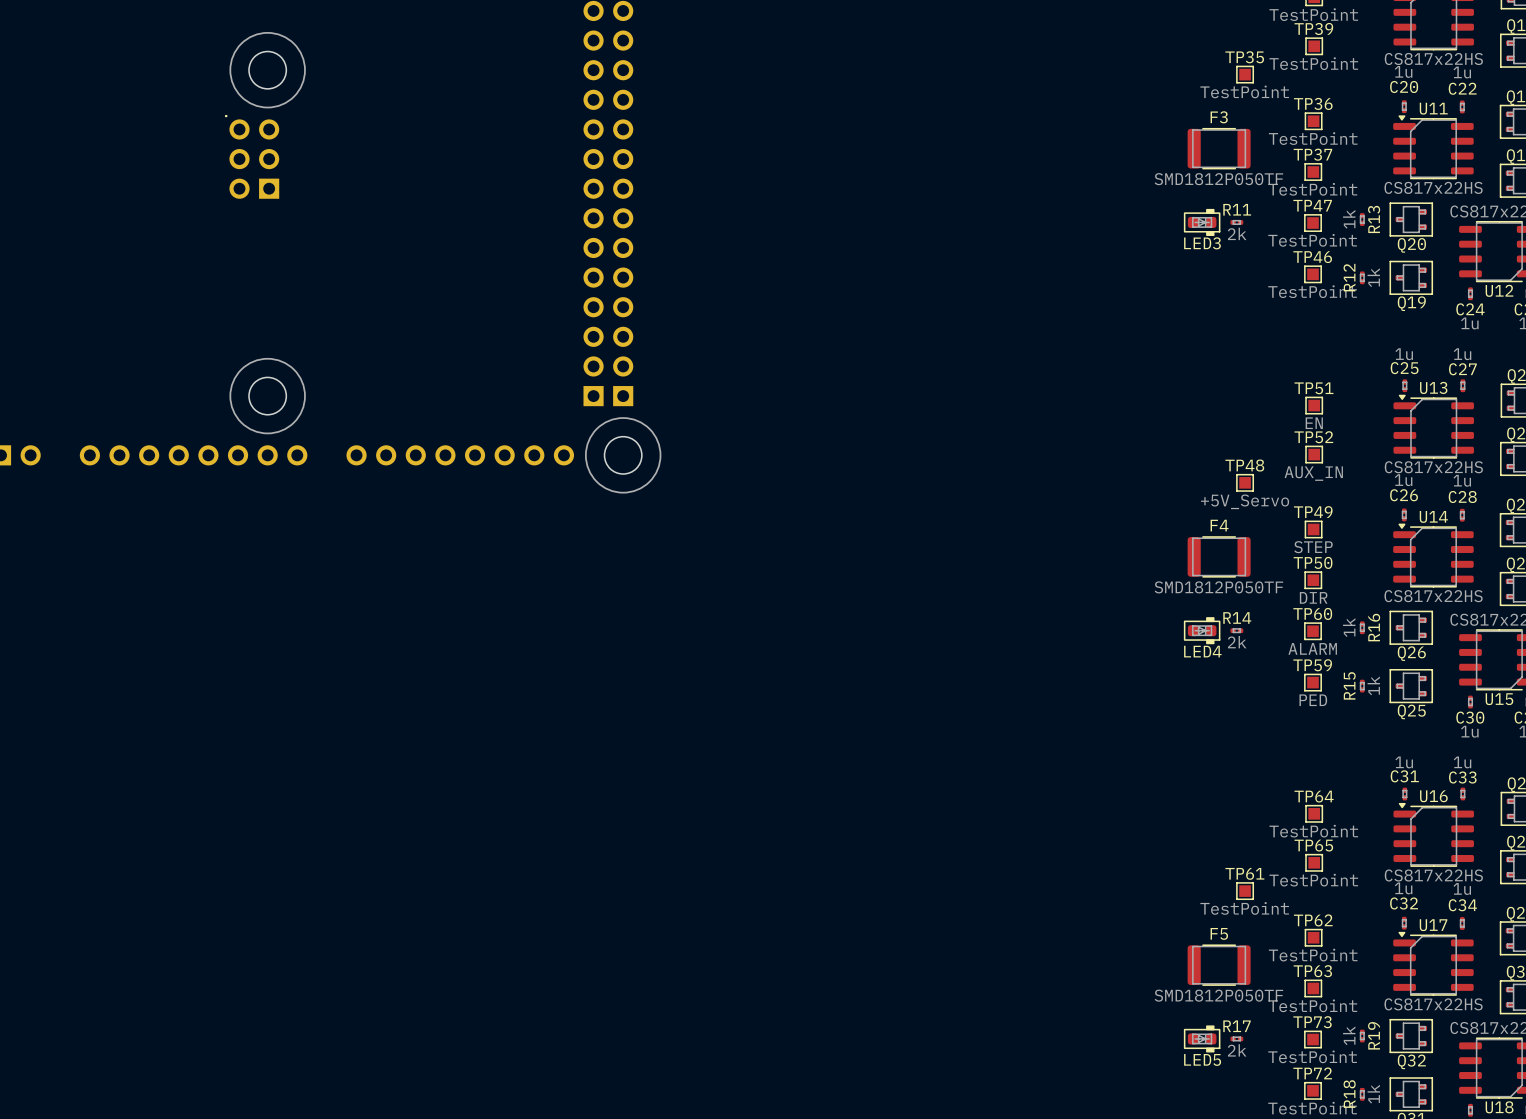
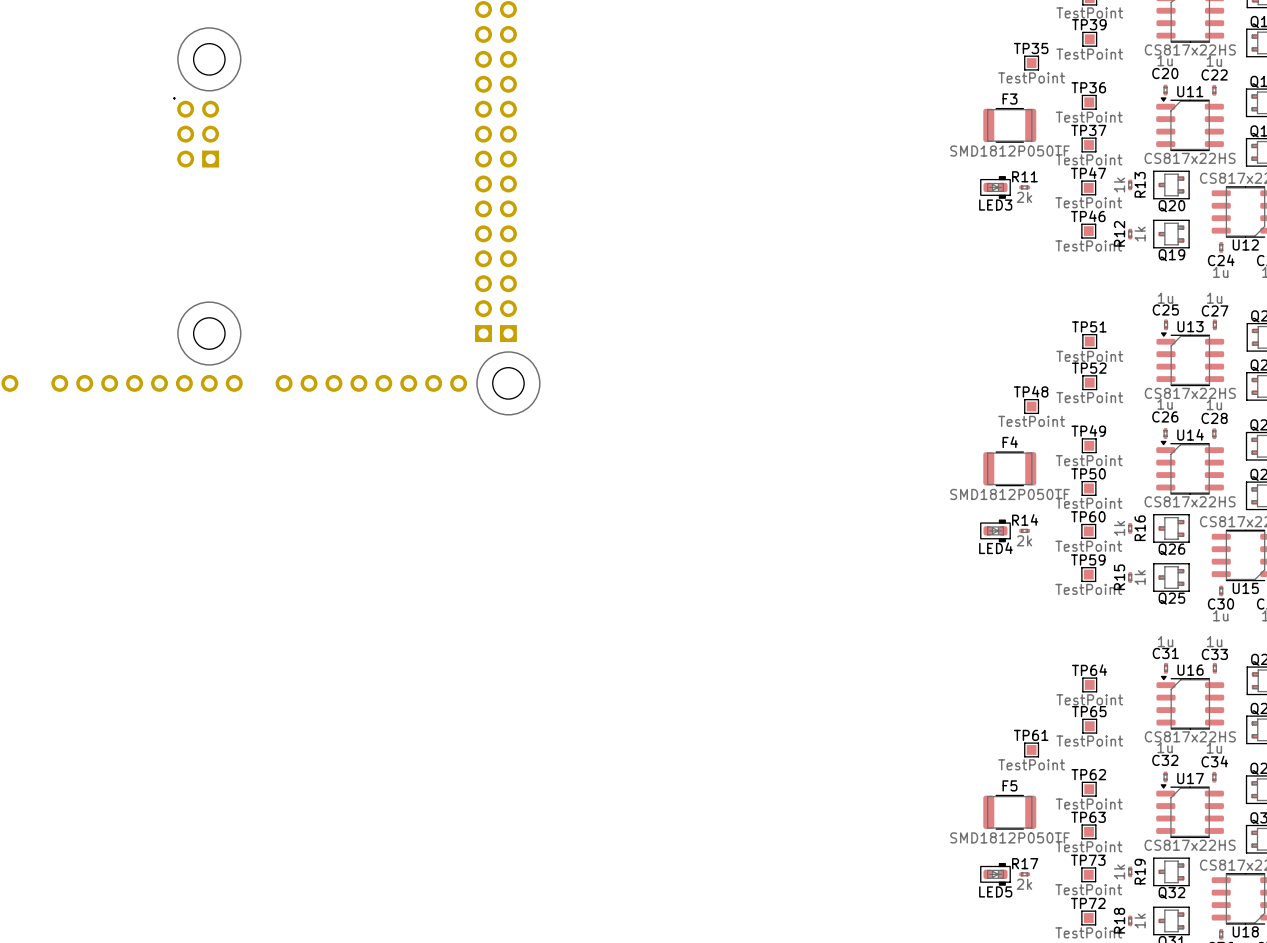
TP51 value: EN (1314, 423) -> TestPoint (1089, 356)
TP52 value: AUX_IN (1313, 473) -> TestPoint (1089, 397)
TP48 value: +5V_Servo (1245, 501) -> TestPoint (1031, 421)
TP49 value: STEP (1313, 547) -> TestPoint (1089, 460)
TP50 value: DIR (1313, 597) -> TestPoint (1089, 503)
TP60 value: ALARM (1312, 648) -> TestPoint (1088, 546)
TP59 value: PED (1313, 700) -> TestPoint (1088, 589)

